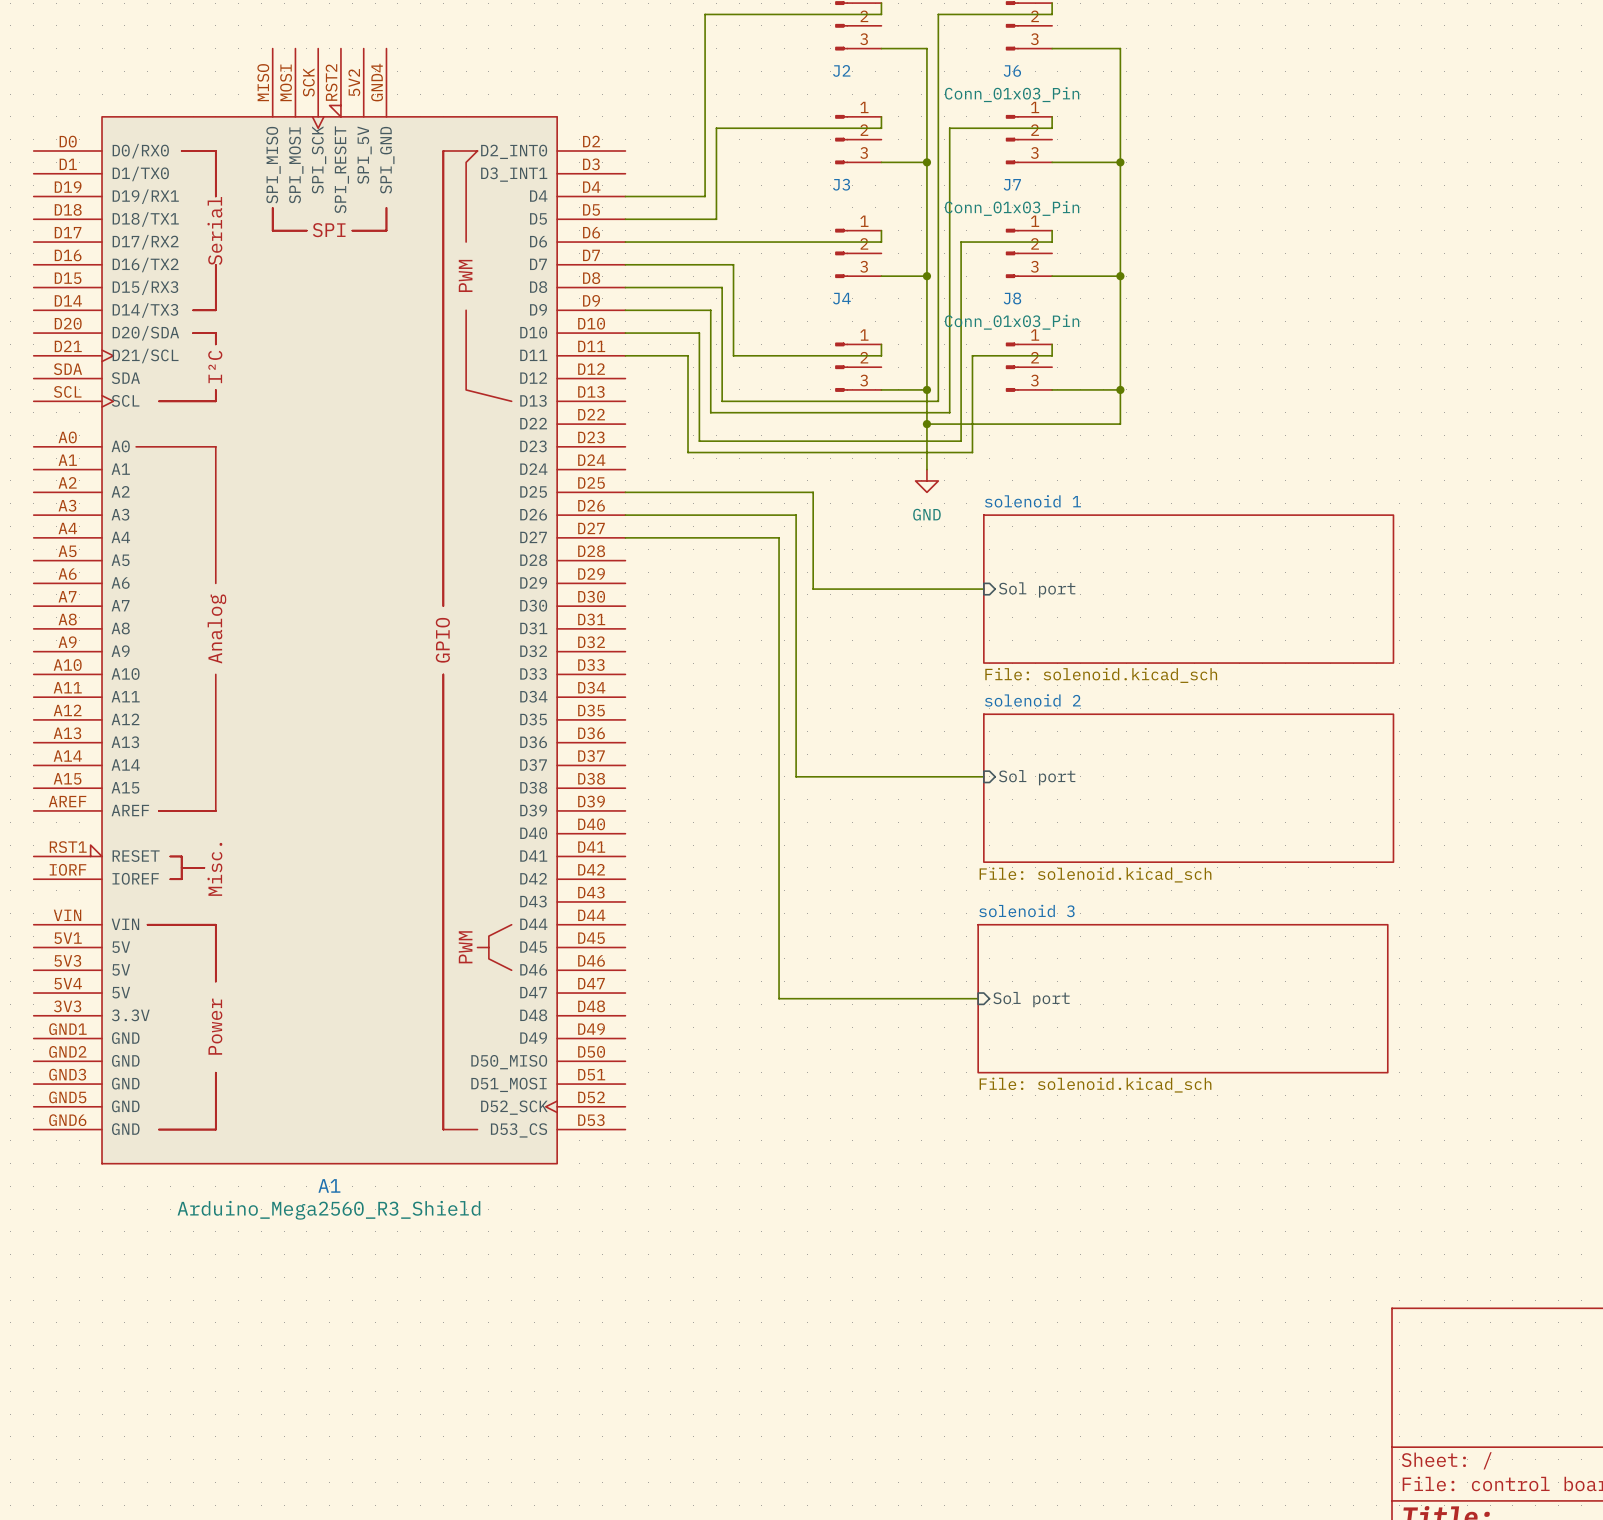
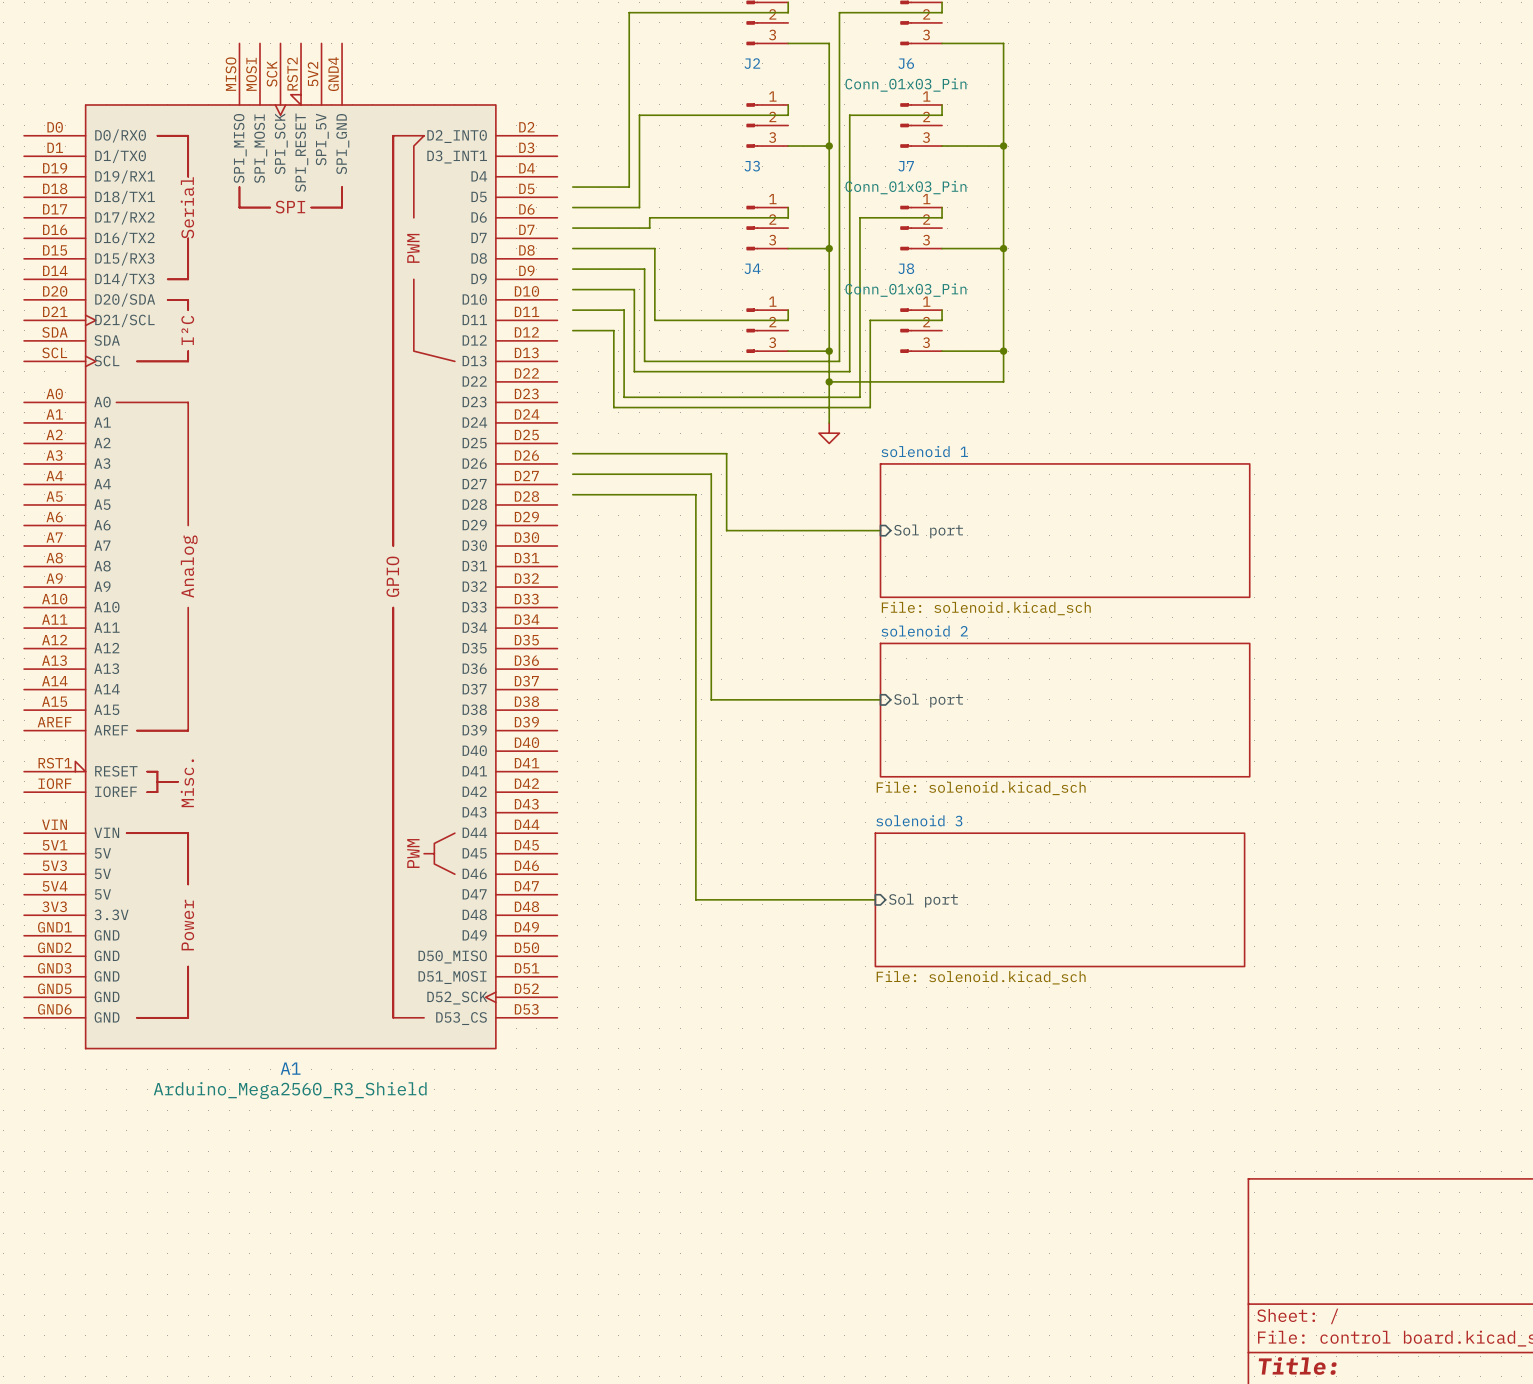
wire: (625, 196) (705, 196) -> (572, 187) (629, 187) (629, 176)
wire: (625, 219) (716, 219) -> (572, 207) (639, 207) (639, 197)
wire: (625, 242) (727, 242) -> (572, 228) (649, 228) (649, 217)
wire: (625, 264) (733, 264) (733, 276) -> (572, 248) (654, 248)
wire: (625, 287) (722, 287) (722, 298) -> (572, 269) (644, 269)
wire: (625, 310) (710, 310) (710, 321) -> (572, 289) (634, 289)
wire: (625, 333) (699, 333) (699, 344) -> (572, 310) (624, 310)
wire: (625, 355) (688, 355) (688, 367) -> (572, 330) (613, 330)
wire: (625, 492) (813, 492) (813, 503) -> (572, 453) (726, 453)
power symbol text: GND (926, 514) -> none
wire: (625, 515) (796, 515) (796, 526) -> (572, 474) (711, 474)
wire: (625, 537) (779, 537) (779, 549) -> (572, 494) (695, 494)

